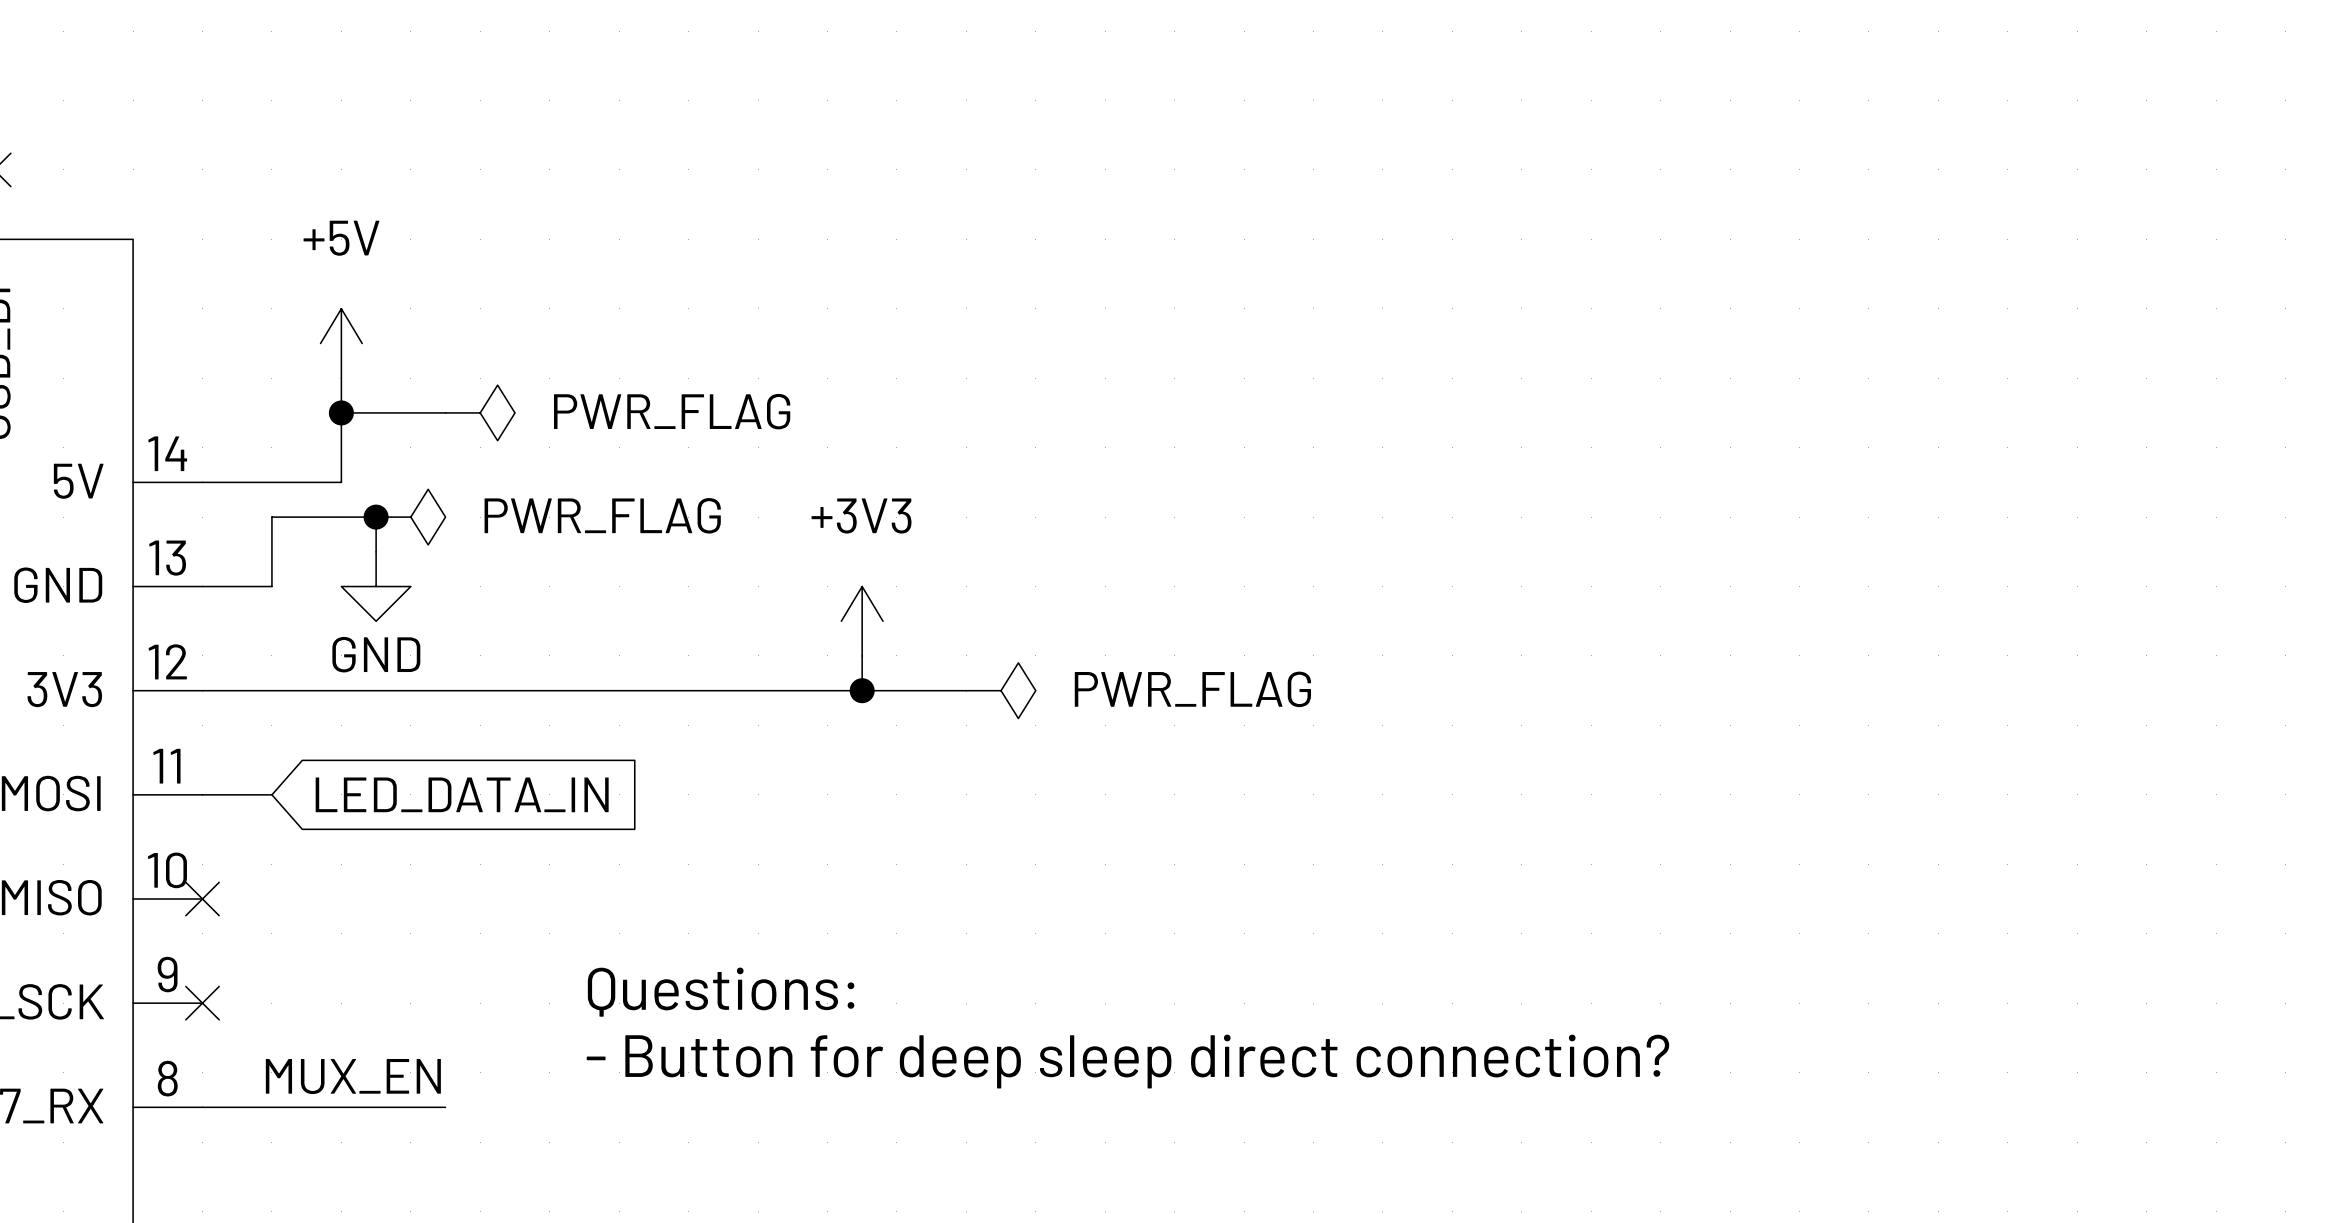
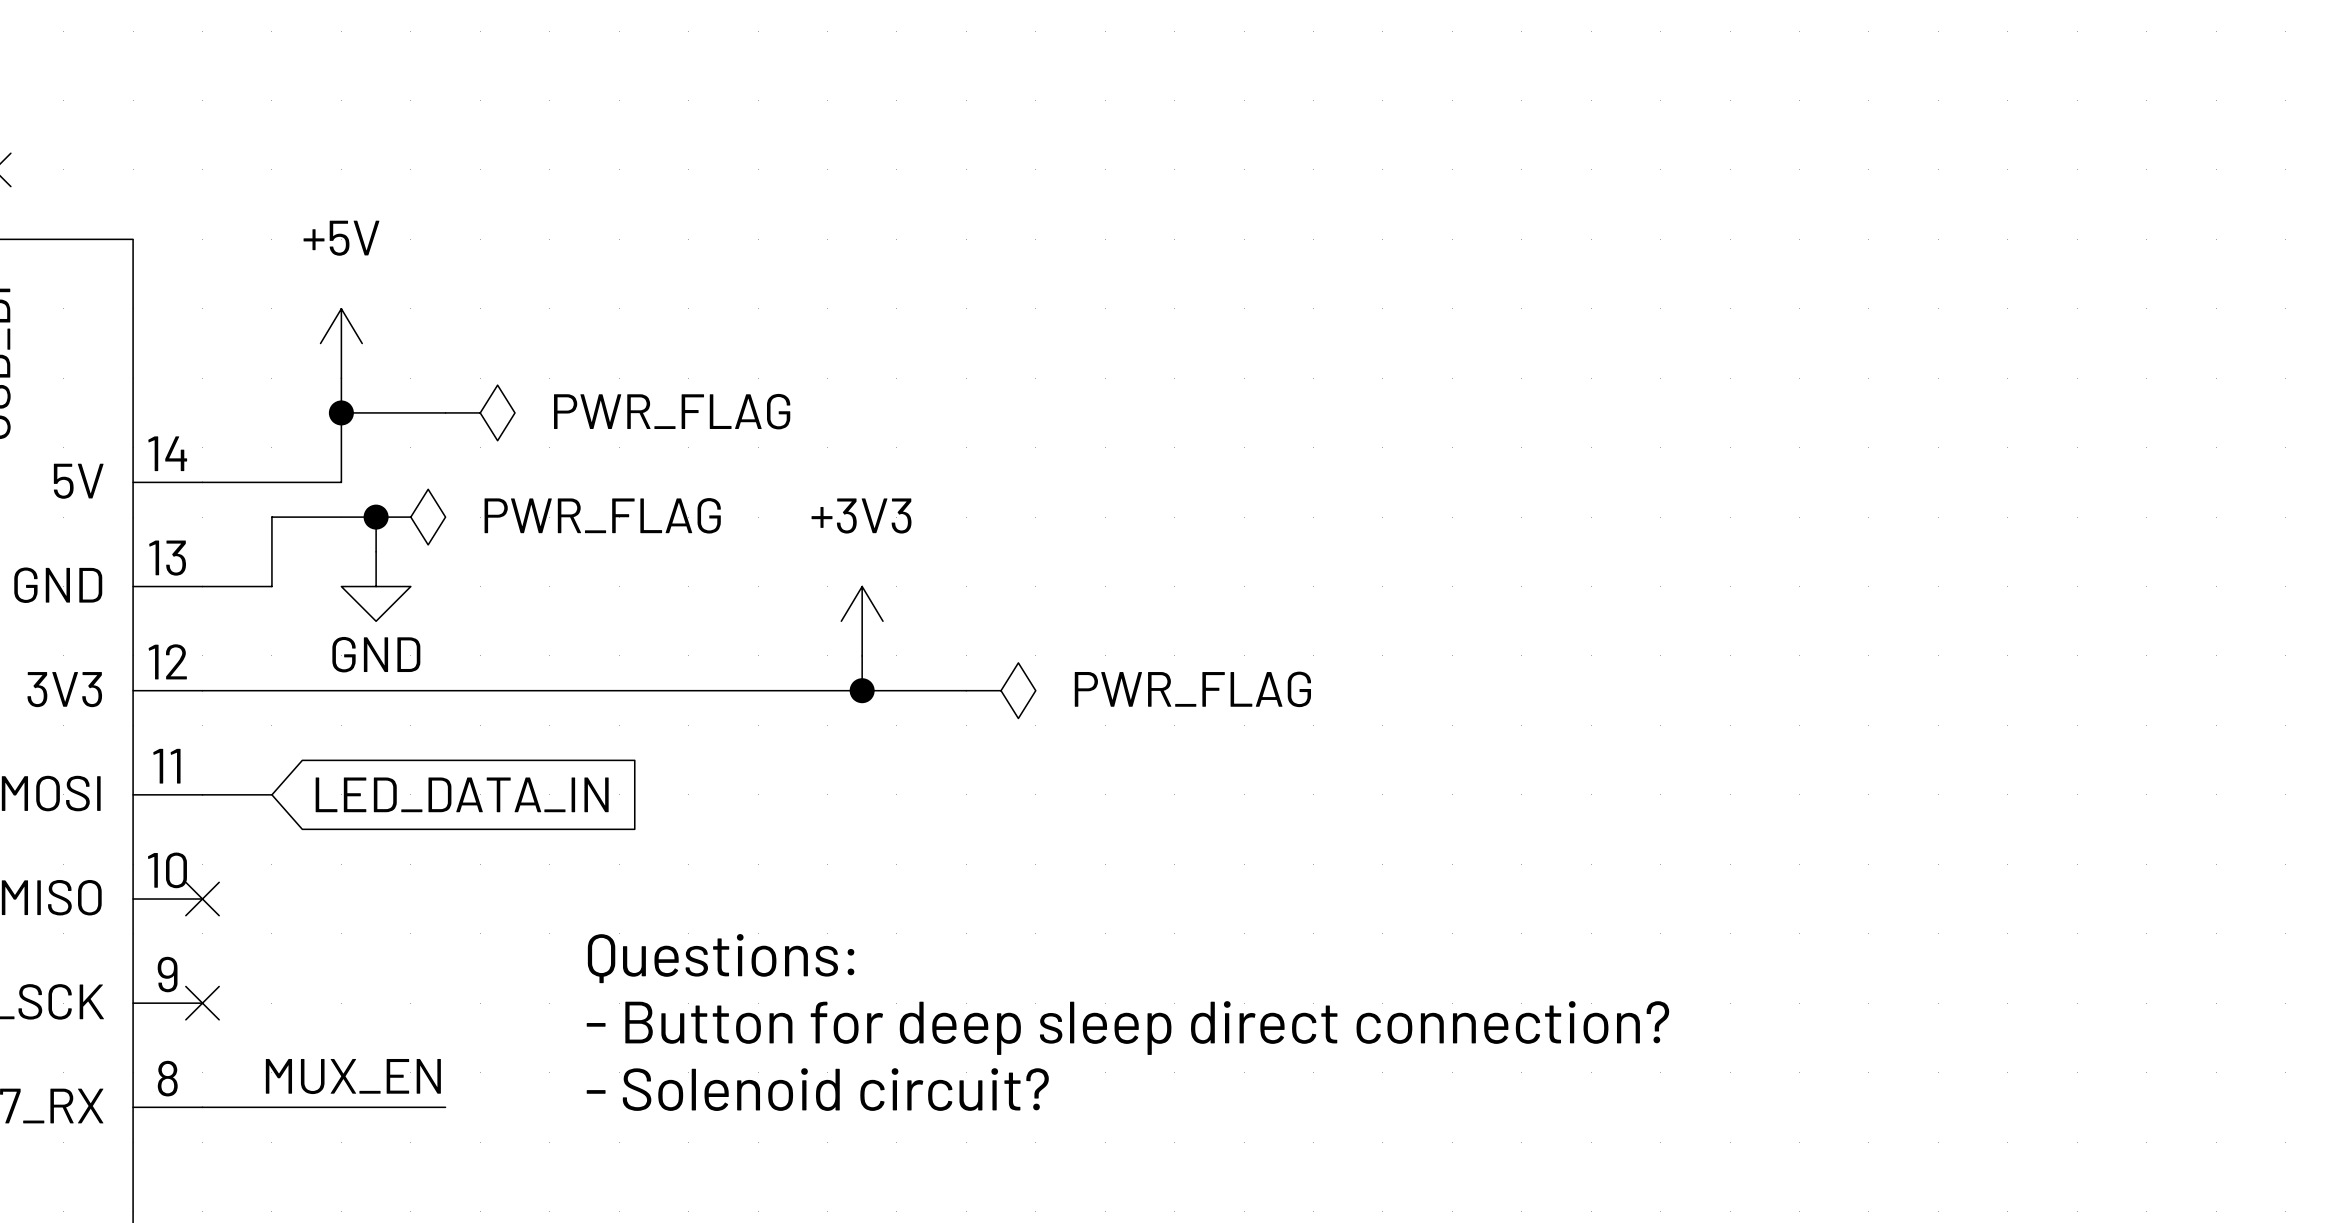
text position: Questions: (721, 992) -> Questions: (721, 958)
text position: - Button for deep sleep direct connection? (1127, 1061) -> - Button for deep sleep direct connection? (1127, 1028)
text: none -> - Solenoid circuit? (817, 1089)

